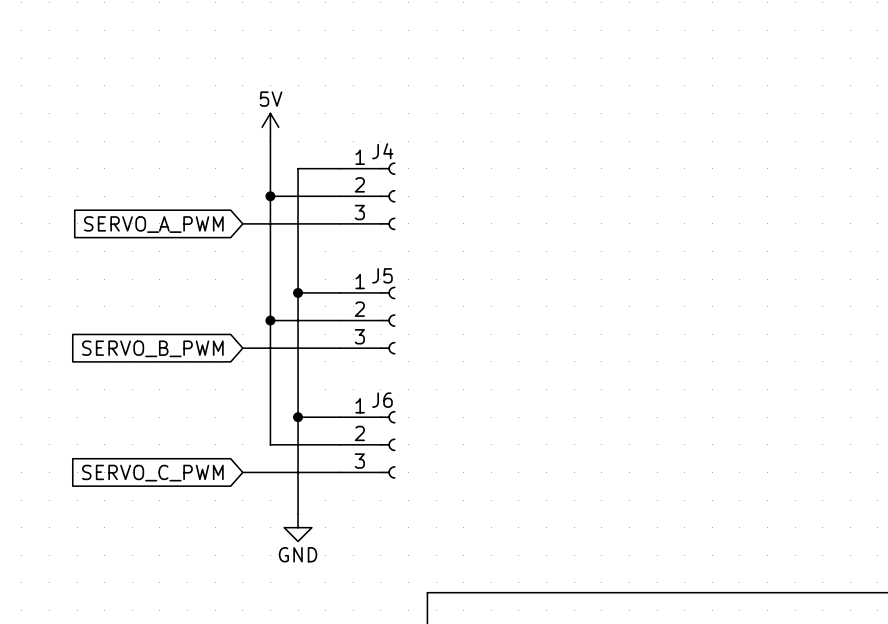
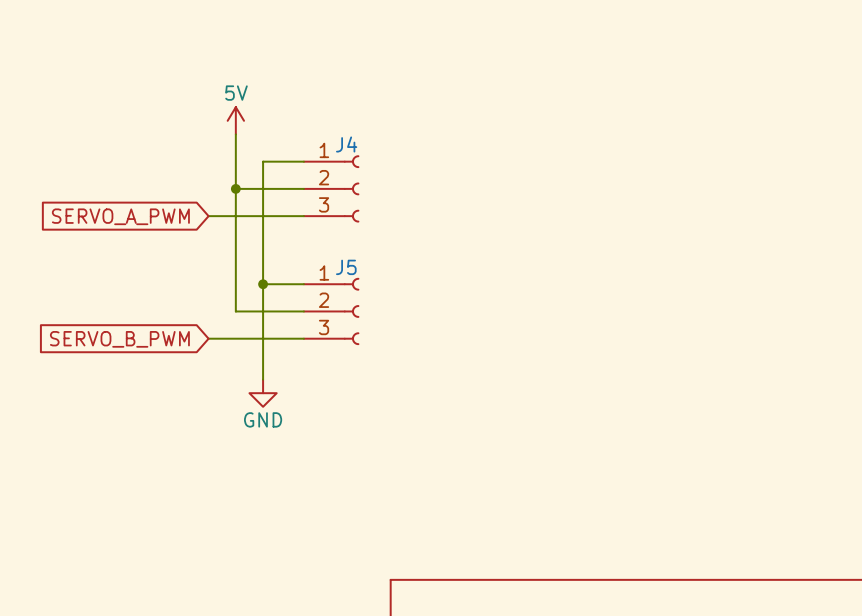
wire: (270, 320) (270, 444) (339, 444) -> none
junction: (270, 320) -> none
wire: (298, 389) (298, 513) -> none
wire: (298, 417) (339, 417) -> none
junction: (298, 417) -> none
J6: (367, 444) -> none
wire: (242, 472) (339, 472) -> none
global label: SERVO_C_PWM (152, 473) -> none
power symbol position: GND (298, 527) -> GND (263, 393)

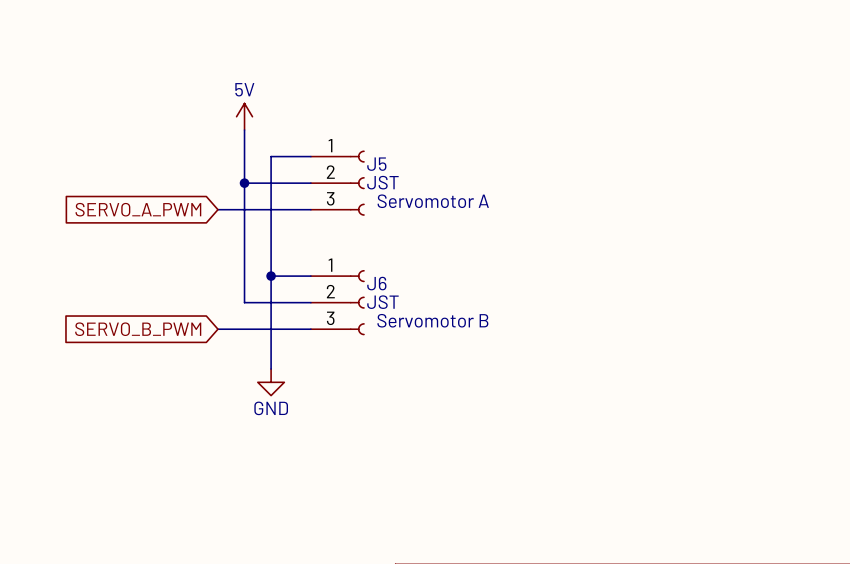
J4 name: J4 (346, 144) -> J5 (376, 164)
J4 value: none -> JST (382, 182)
J4 text: none -> Servomotor A (433, 201)
J5 name: J5 (346, 267) -> J6 (376, 283)
J5 value: none -> JST (382, 302)
J5 text: none -> Servomotor B (432, 320)

